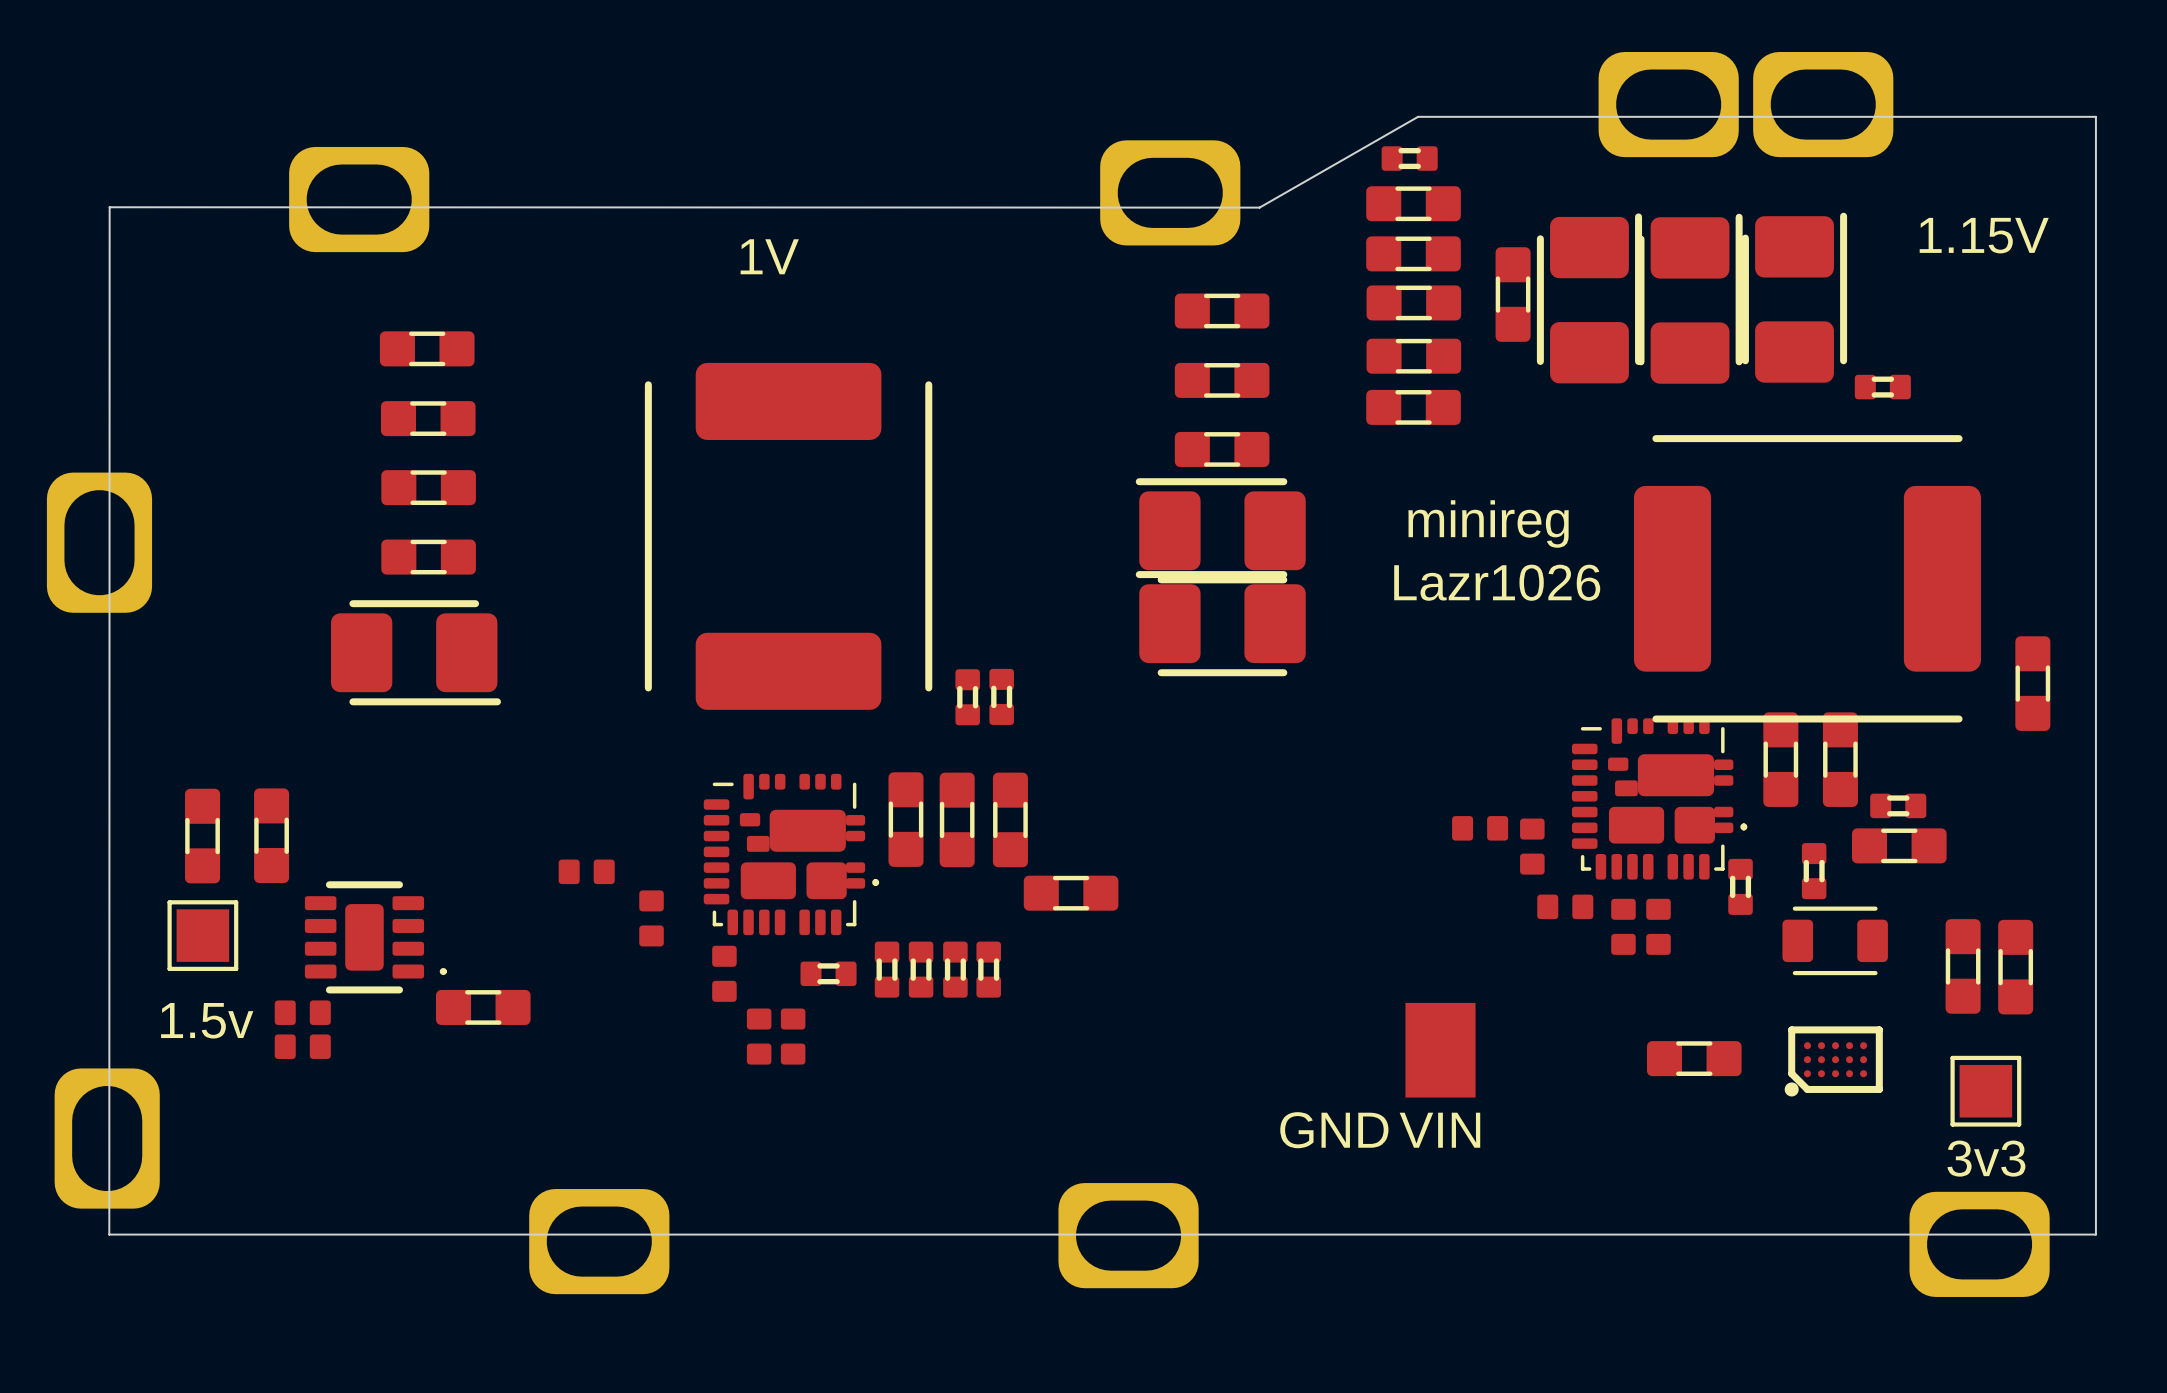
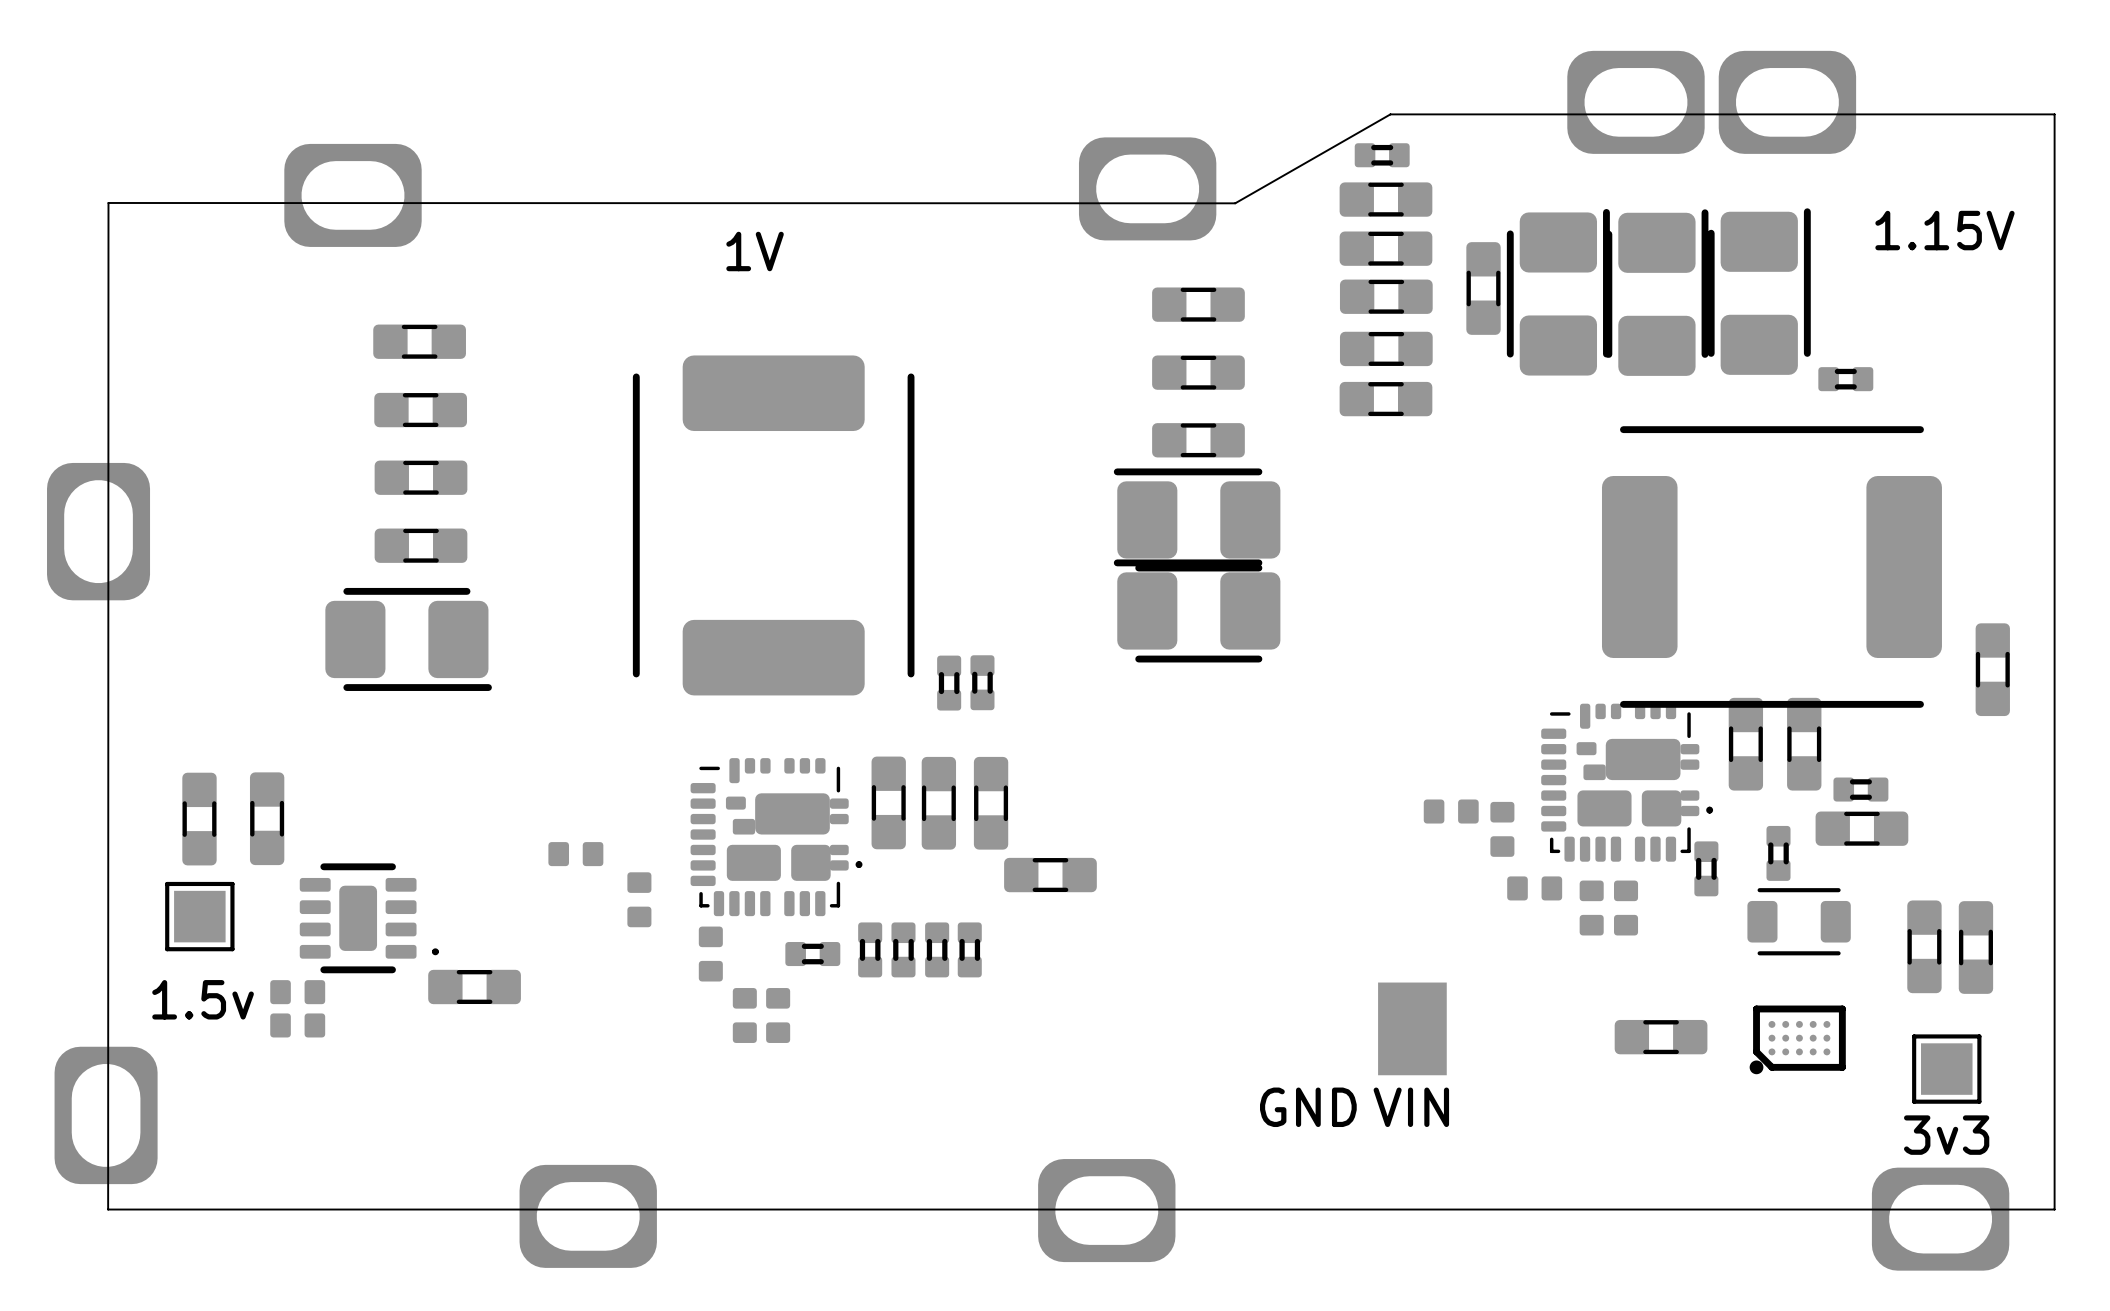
text: minireg (1488, 524) -> none
text: Lazr1026 (1497, 582) -> none

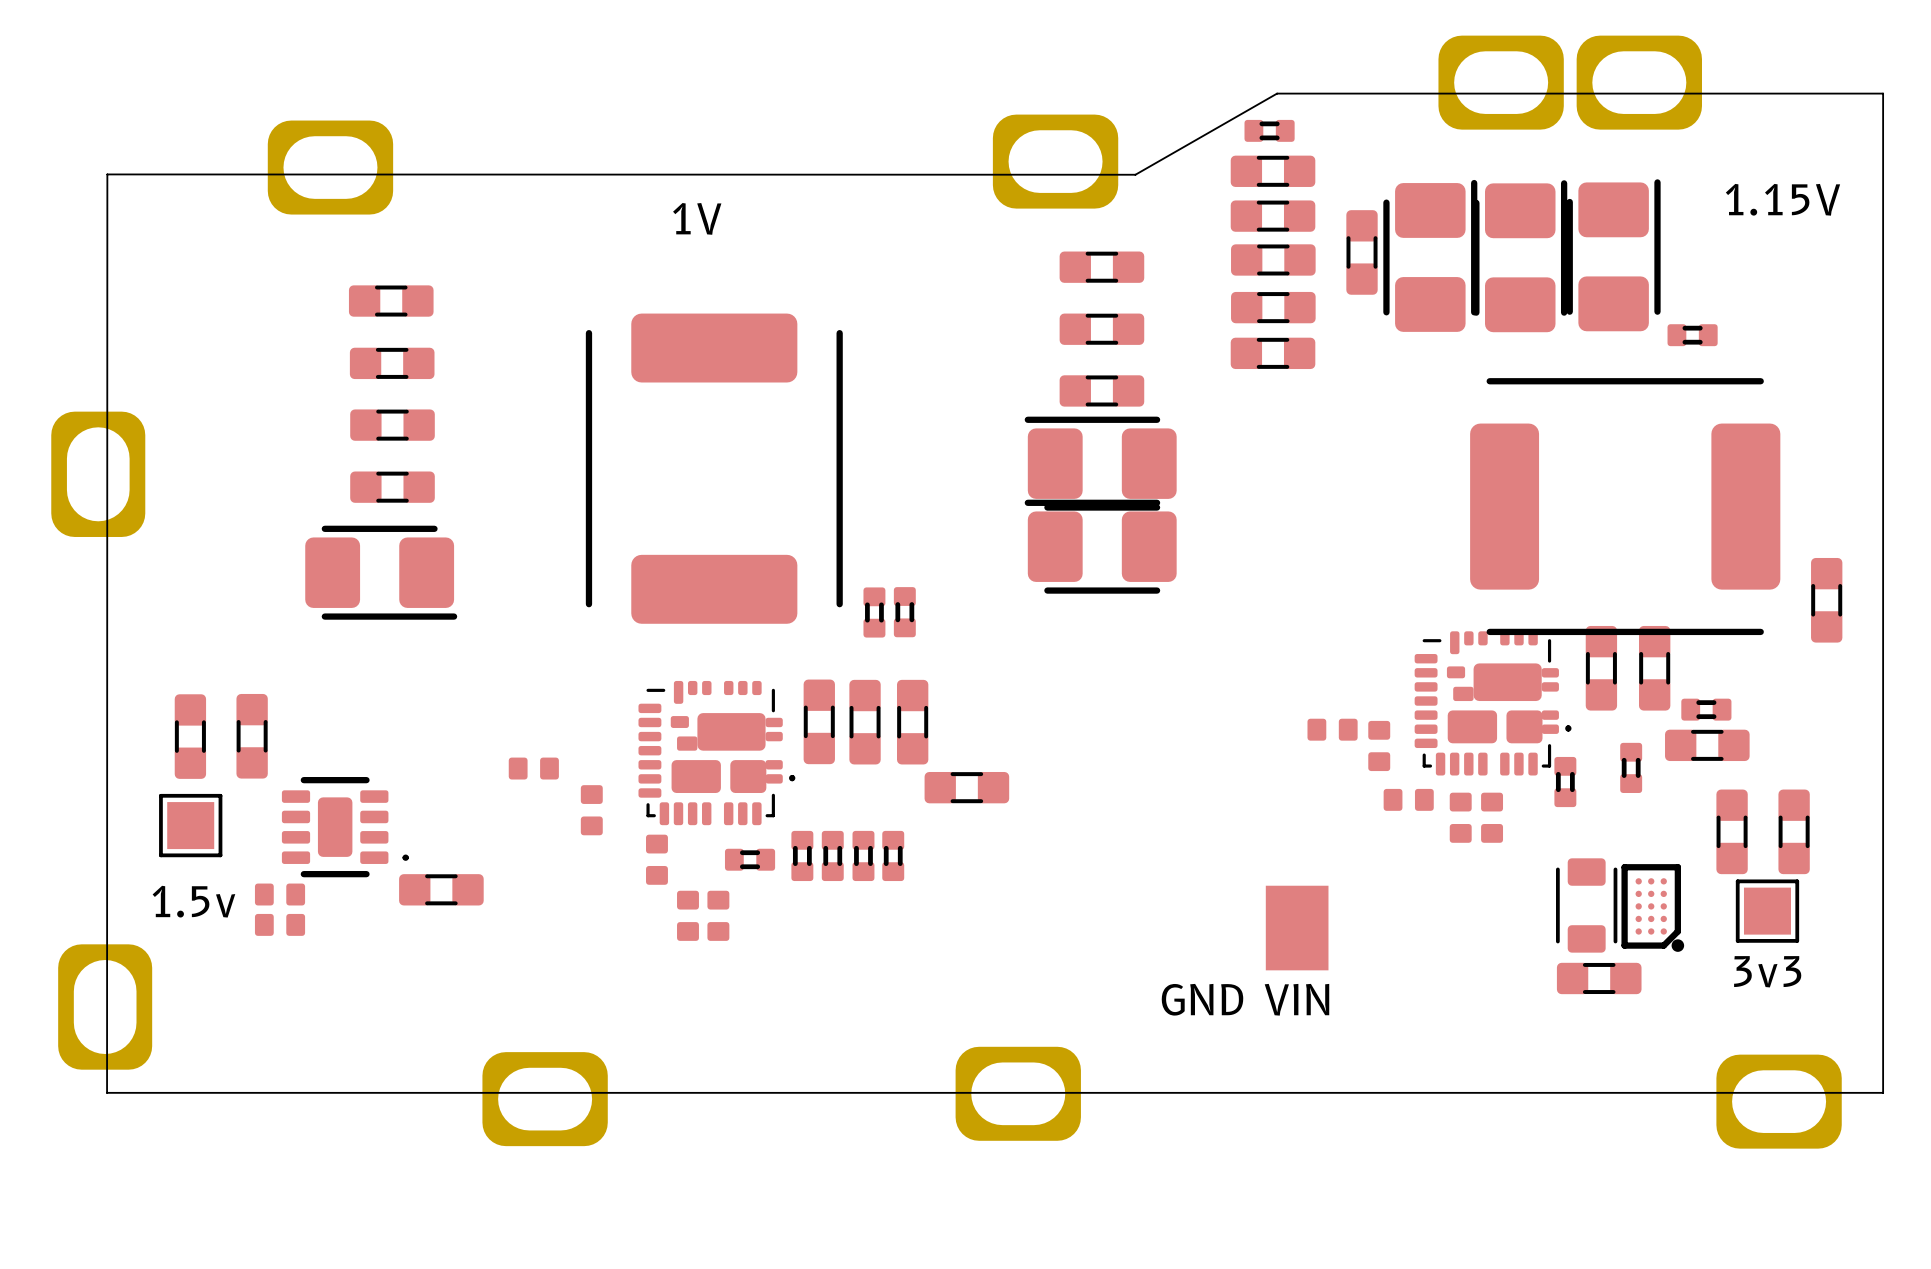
part rotation: 0° (1799, 921) -> 90° clockwise (1586, 905)
part position: (1799, 921) -> (1586, 905)
part: none -> (1732, 831)
part: none -> (1794, 831)
part: (1924, 946) -> none
part: (1975, 947) -> none
part position: (1661, 1037) -> (1599, 978)
part rotation: 0° (1797, 1039) -> 90° counterclockwise (1652, 907)
3v3 position: (1946, 1069) -> (1767, 911)

